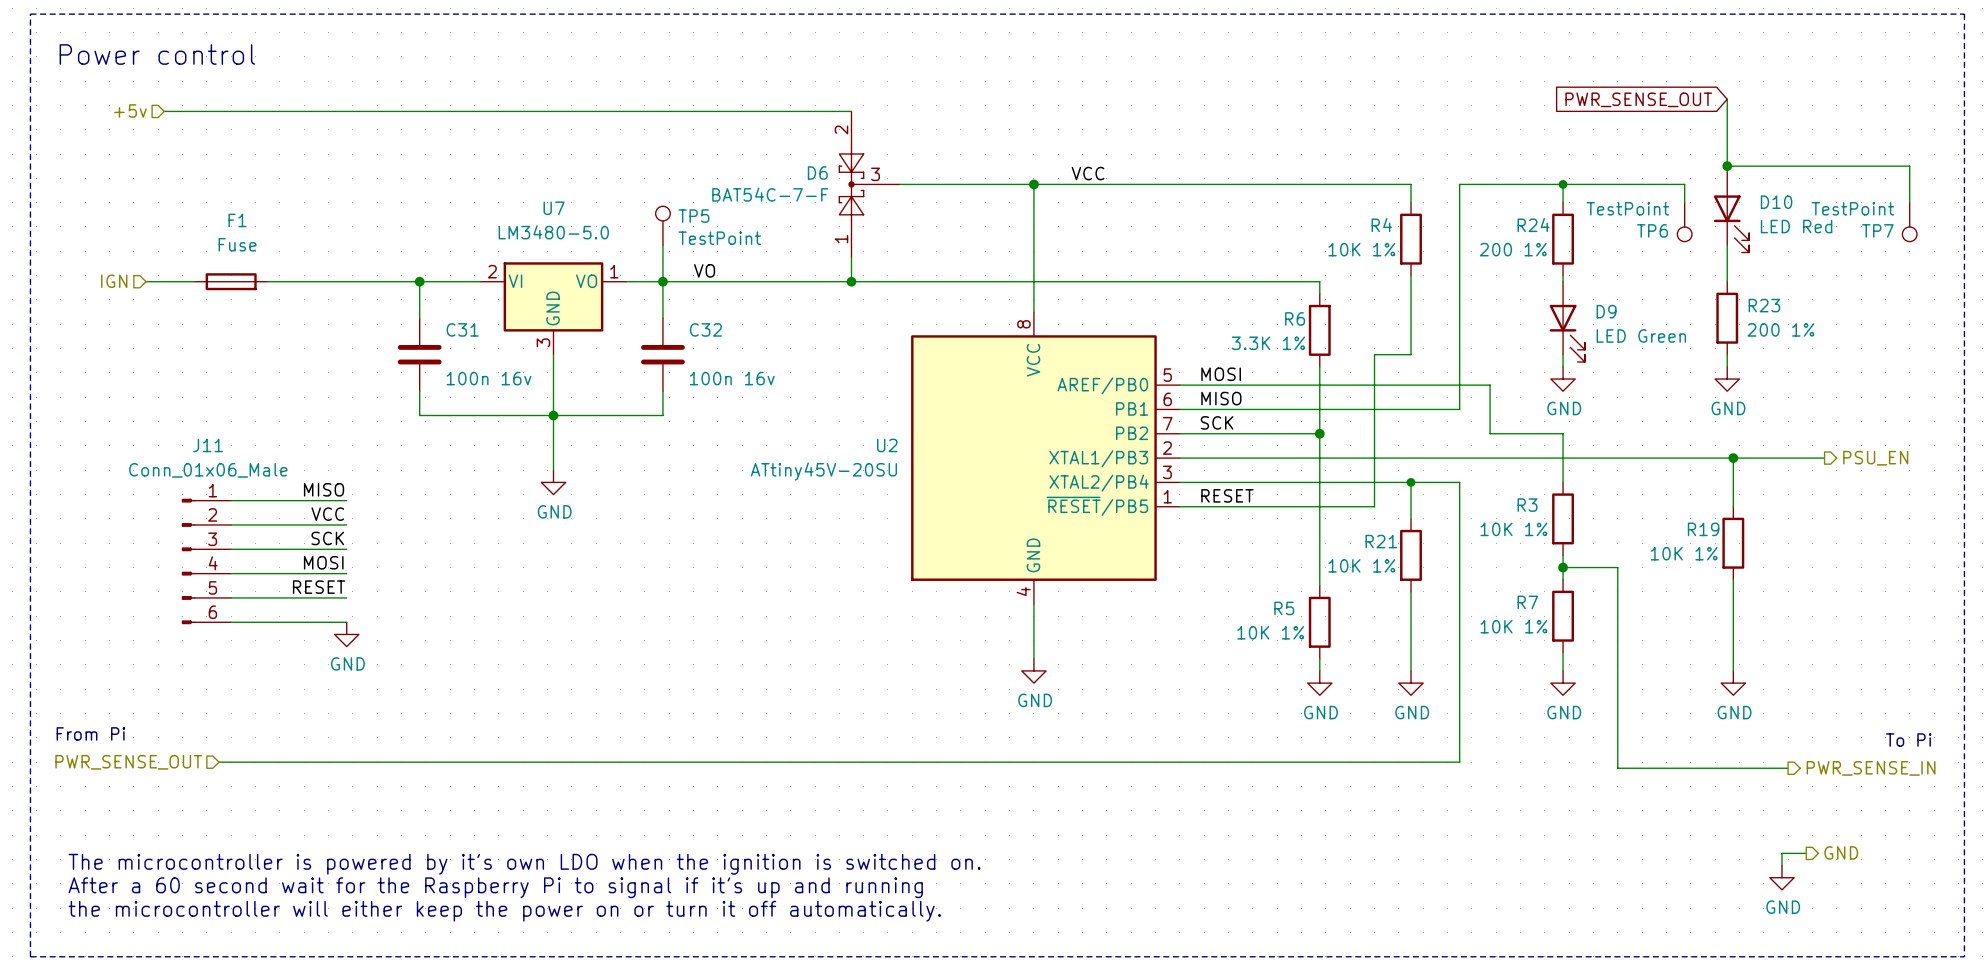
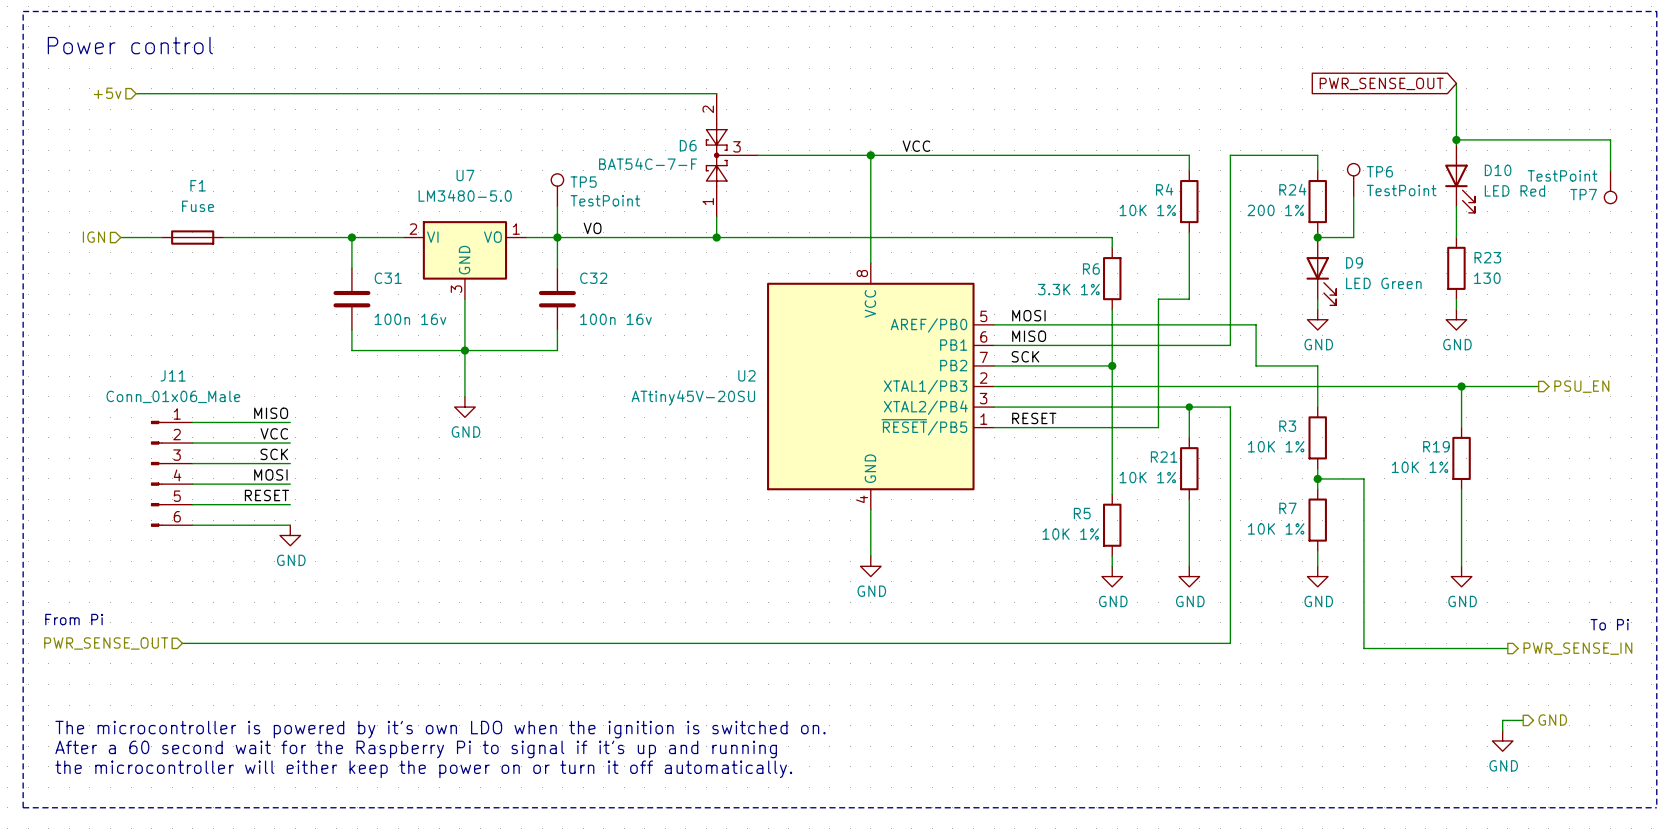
wire: (1563, 184) (1684, 184) (1684, 202) -> none
junction: (1563, 184) -> none
TP6 position: (1684, 222) -> (1353, 180)
wire: none -> (1353, 196) (1353, 237) (1317, 237)
TP6 rotation: 0° (1684, 234) -> 180° (1353, 169)
junction: none -> (1317, 237)
R23 value: 200 1% (1780, 329) -> 130 (1487, 278)

